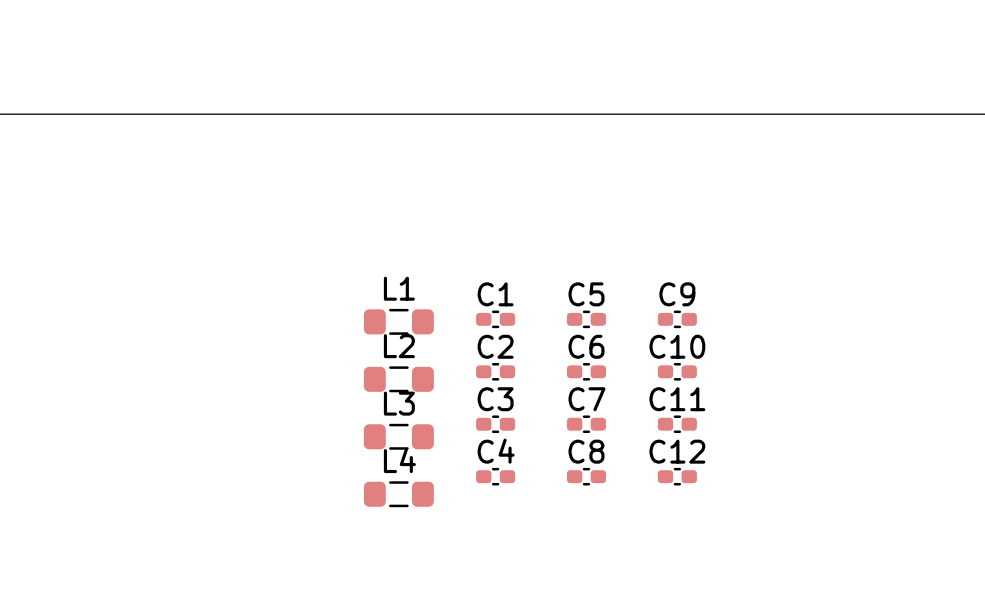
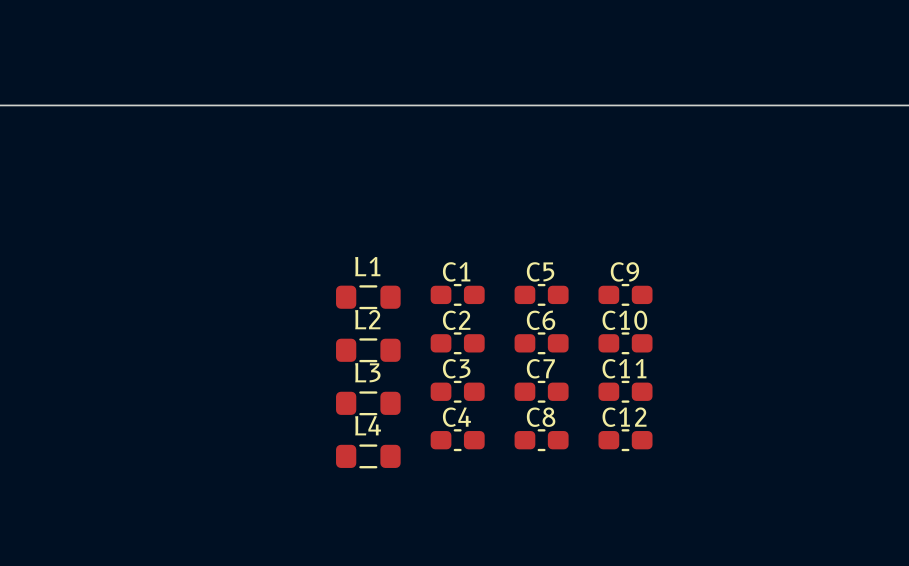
C1 footprint: [476, 310, 516, 329] -> [430, 283, 485, 306]
C5 footprint: [566, 310, 607, 329] -> [514, 283, 569, 306]
C9 footprint: [657, 310, 697, 329] -> [598, 283, 653, 306]
C2 footprint: [476, 363, 516, 381] -> [430, 332, 485, 355]
C6 footprint: [566, 363, 607, 381] -> [514, 332, 569, 355]
C10 footprint: [657, 363, 697, 381] -> [598, 332, 653, 355]
C3 footprint: [476, 415, 516, 434] -> [430, 380, 485, 403]
C7 footprint: [566, 415, 607, 434] -> [514, 380, 569, 403]
C11 footprint: [657, 415, 697, 434] -> [598, 380, 653, 403]
C4 footprint: [476, 467, 516, 486] -> [430, 429, 485, 452]
C8 footprint: [566, 467, 607, 486] -> [514, 429, 569, 452]
C12 footprint: [657, 467, 697, 486] -> [598, 429, 653, 452]

